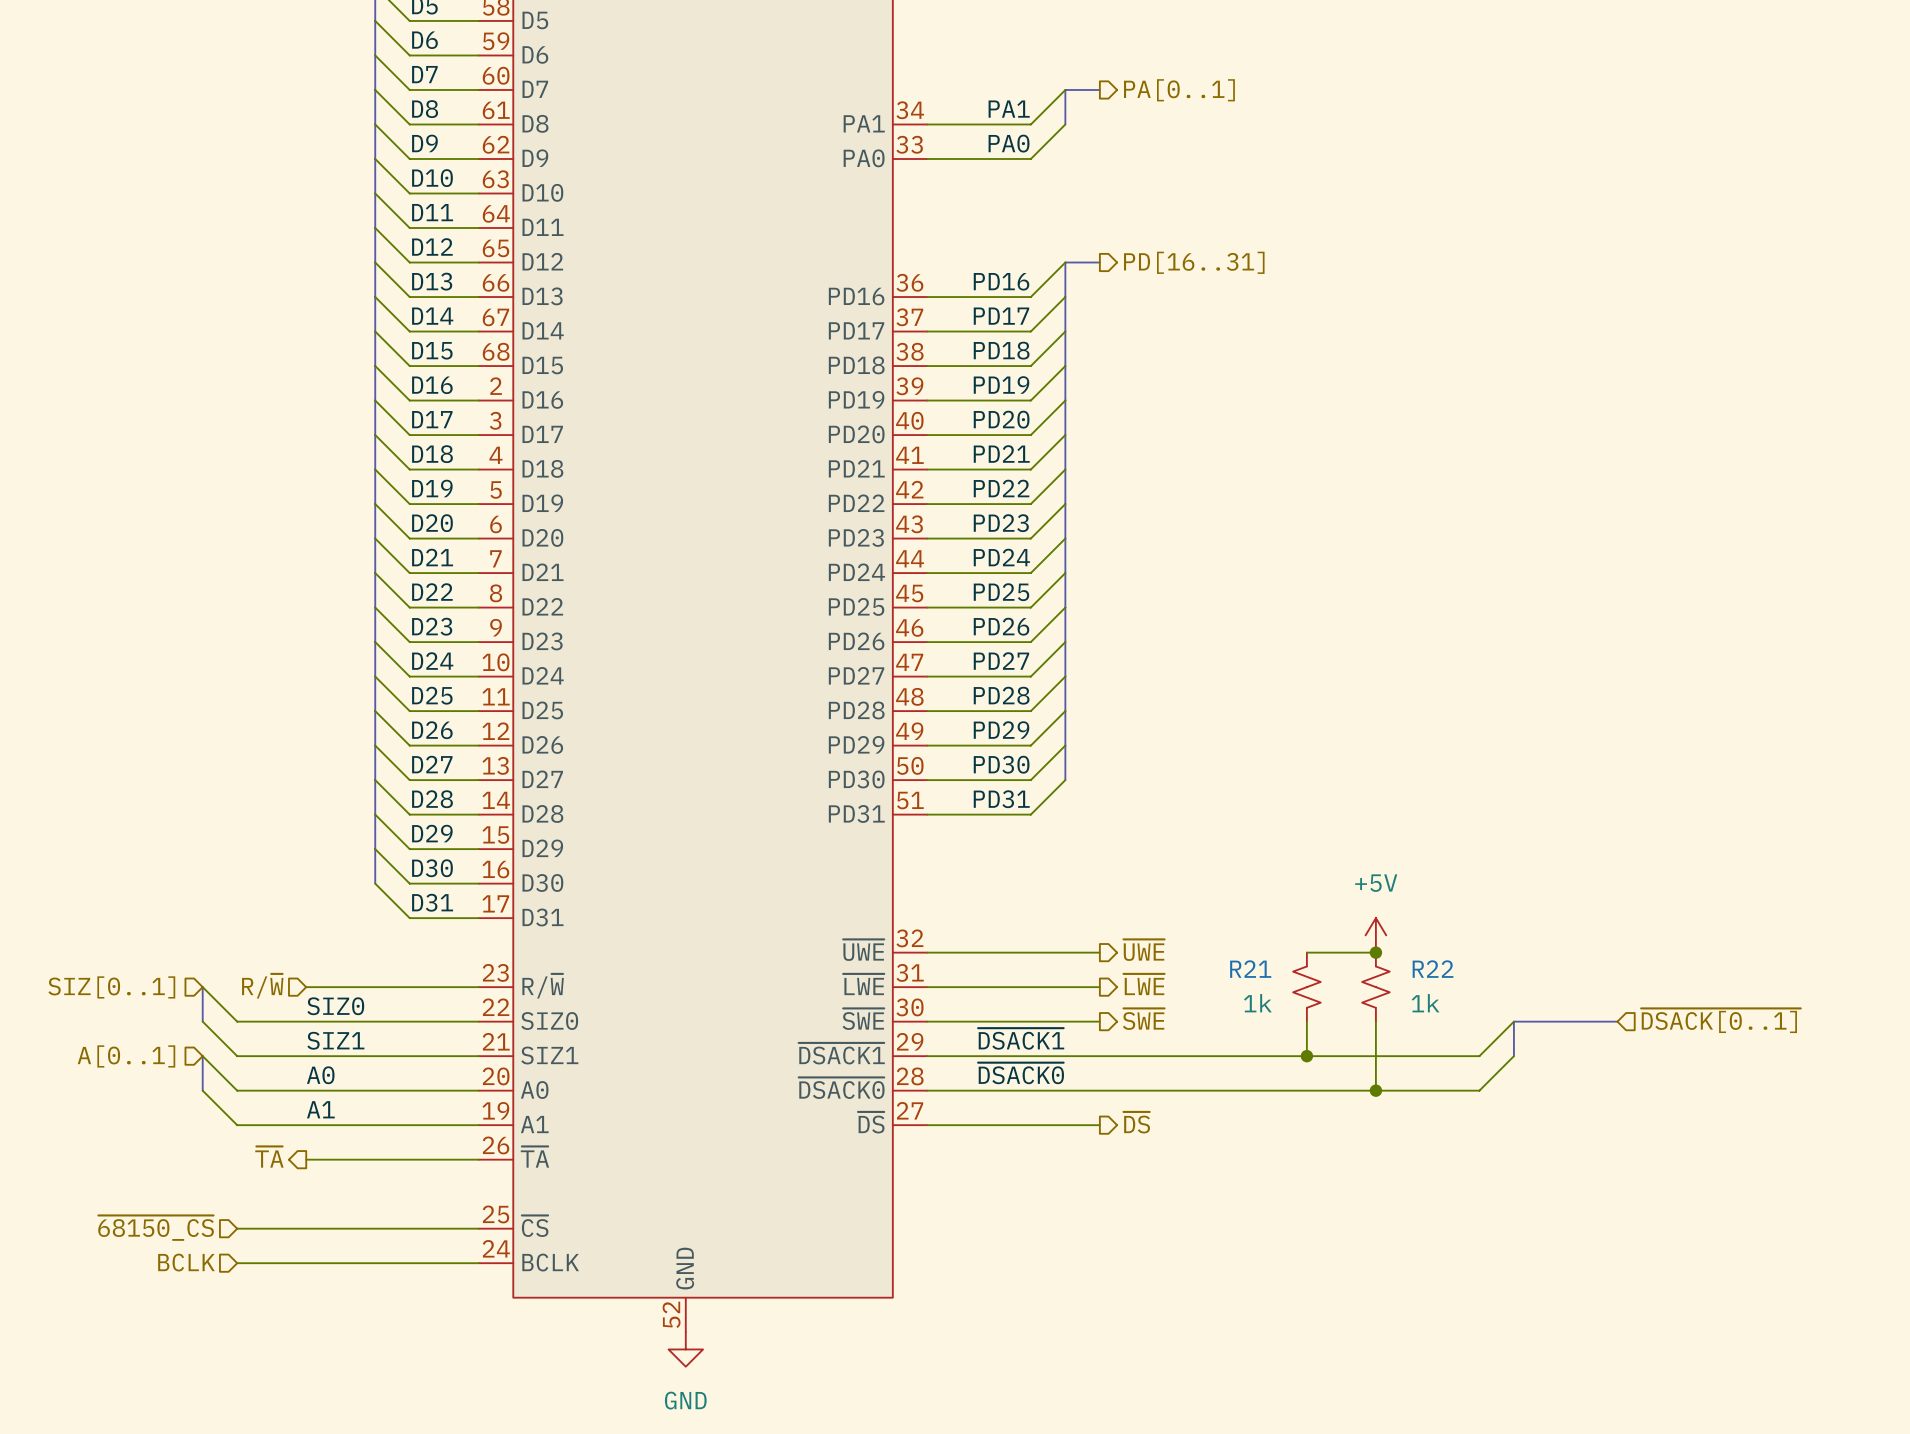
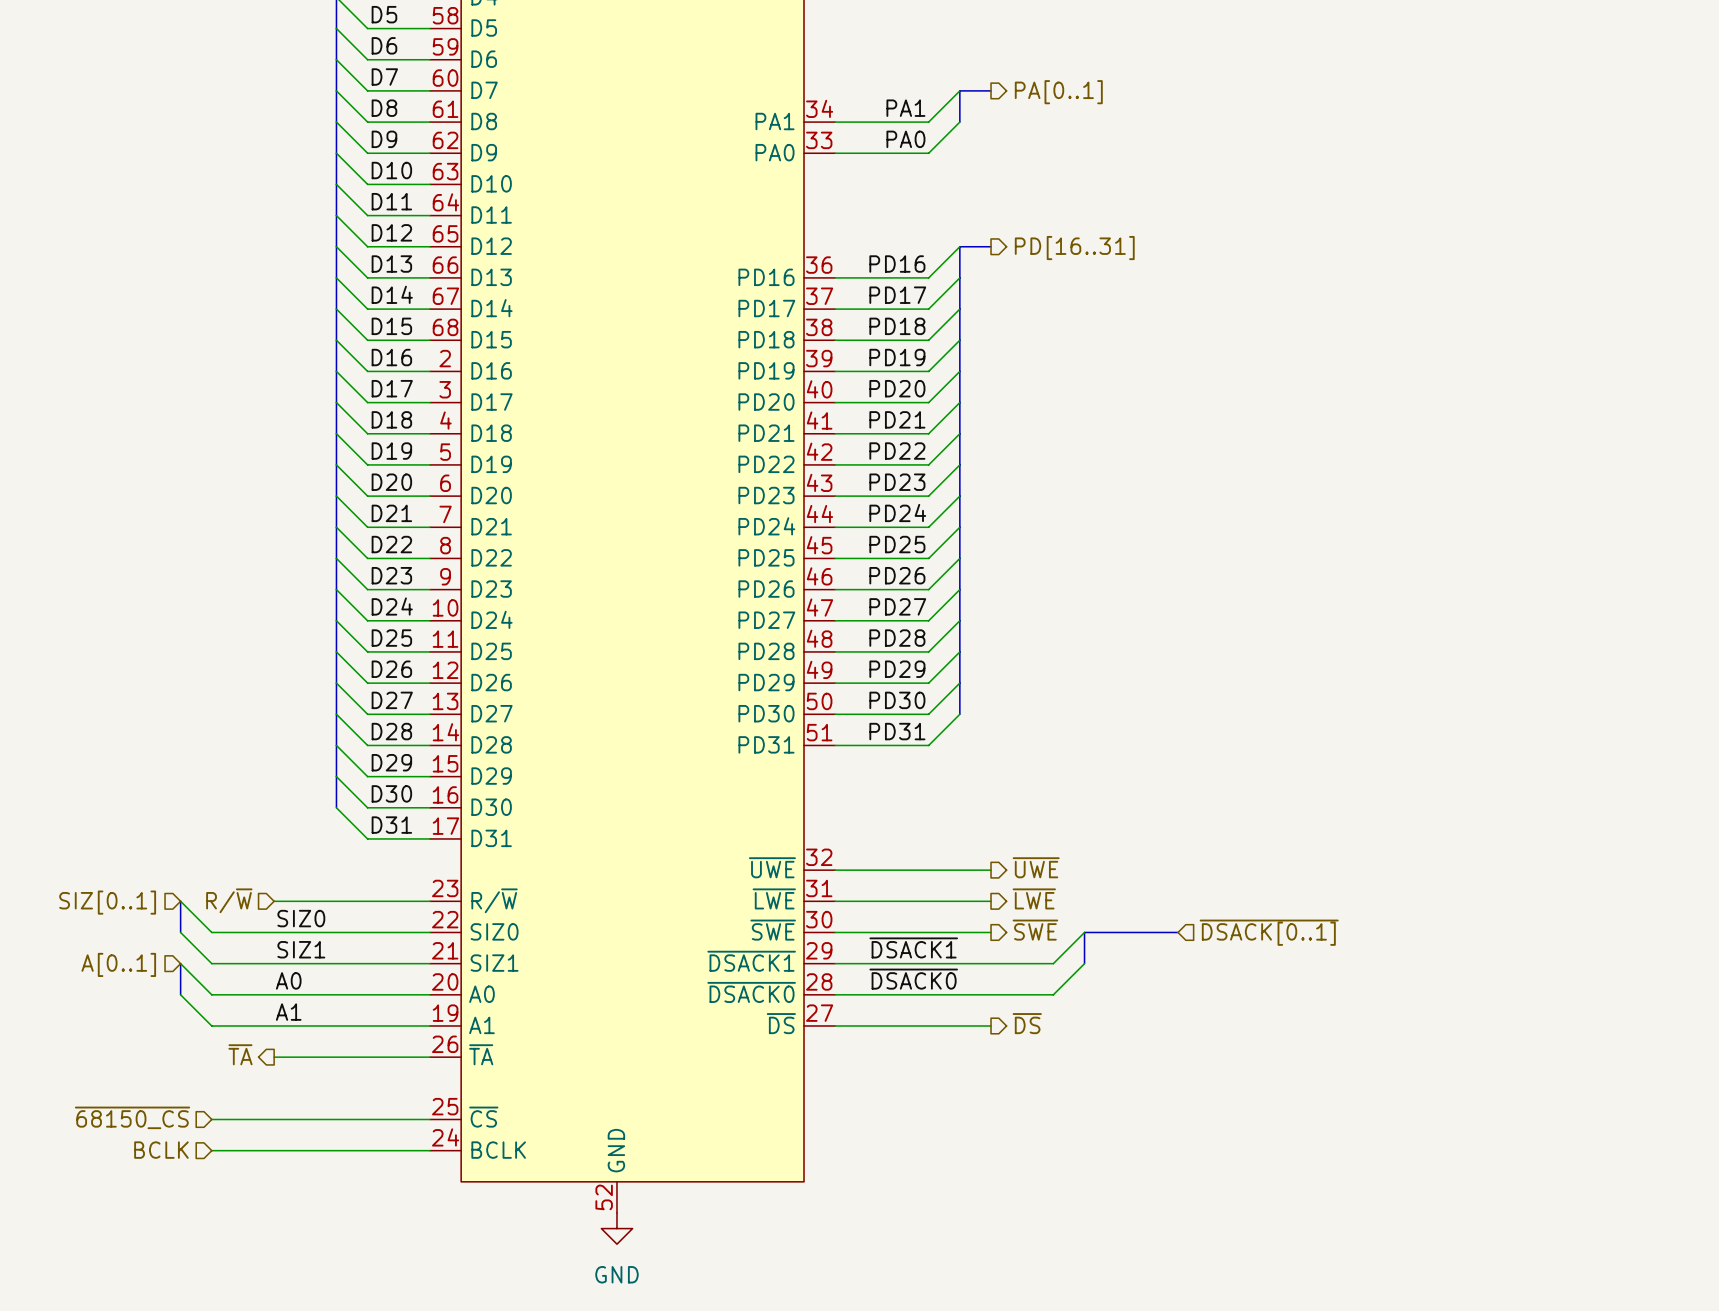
power symbol: +5V (1375, 935) -> none
wire: (1306, 952) (1375, 952) -> none
junction: (1375, 952) -> none
R21: 1k (1306, 987) -> none
R22: 1k (1375, 987) -> none
hierarchical label position: ~{DSACK[0..1]} (1720, 1020) -> ~{DSACK[0..1]} (1269, 932)
wire: (1306, 1021) (1306, 1056) -> none
wire: (1375, 1021) (1375, 1090) -> none
wire: (1513, 1021) (1479, 1056) (1168, 1056) -> (1084, 932) (1053, 963)
bus: (1617, 1021) (1513, 1021) (1513, 1056) -> (1178, 932) (1084, 932) (1084, 963)
junction: (1306, 1056) -> none
wire: (1513, 1056) (1479, 1090) (1168, 1090) -> (1084, 963) (1053, 994)
junction: (1375, 1090) -> none

